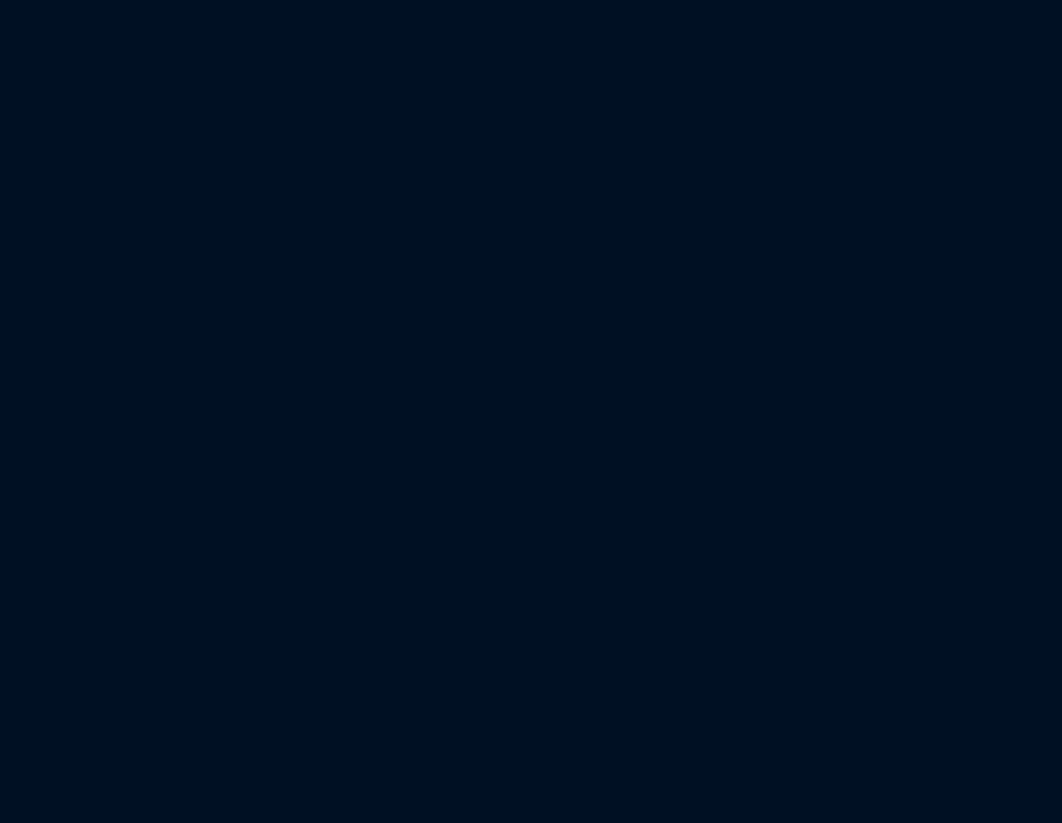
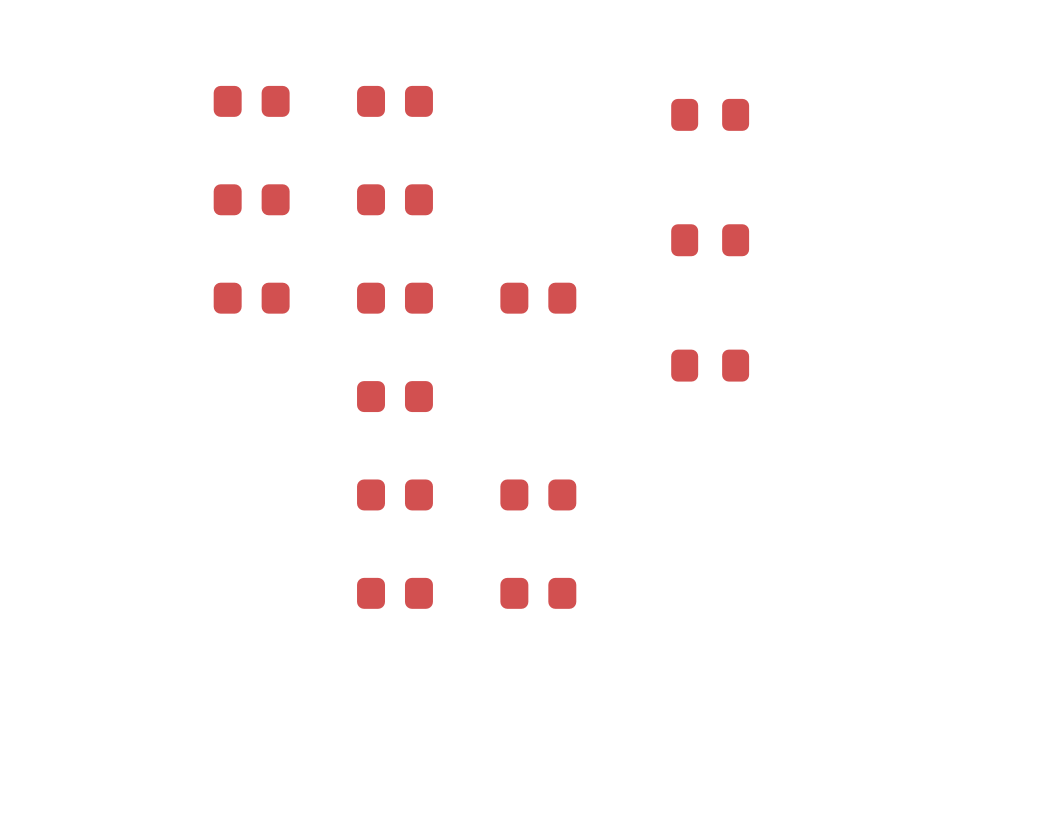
part: none -> (251, 101)
part: none -> (394, 101)
part: none -> (710, 114)
part: none -> (251, 199)
part: none -> (394, 199)
part: none -> (710, 240)
part: none -> (251, 298)
part: none -> (394, 298)
part: none -> (538, 298)
part: none -> (710, 365)
part: none -> (394, 396)
part: none -> (394, 494)
part: none -> (538, 494)
part: none -> (394, 593)
part: none -> (538, 593)

